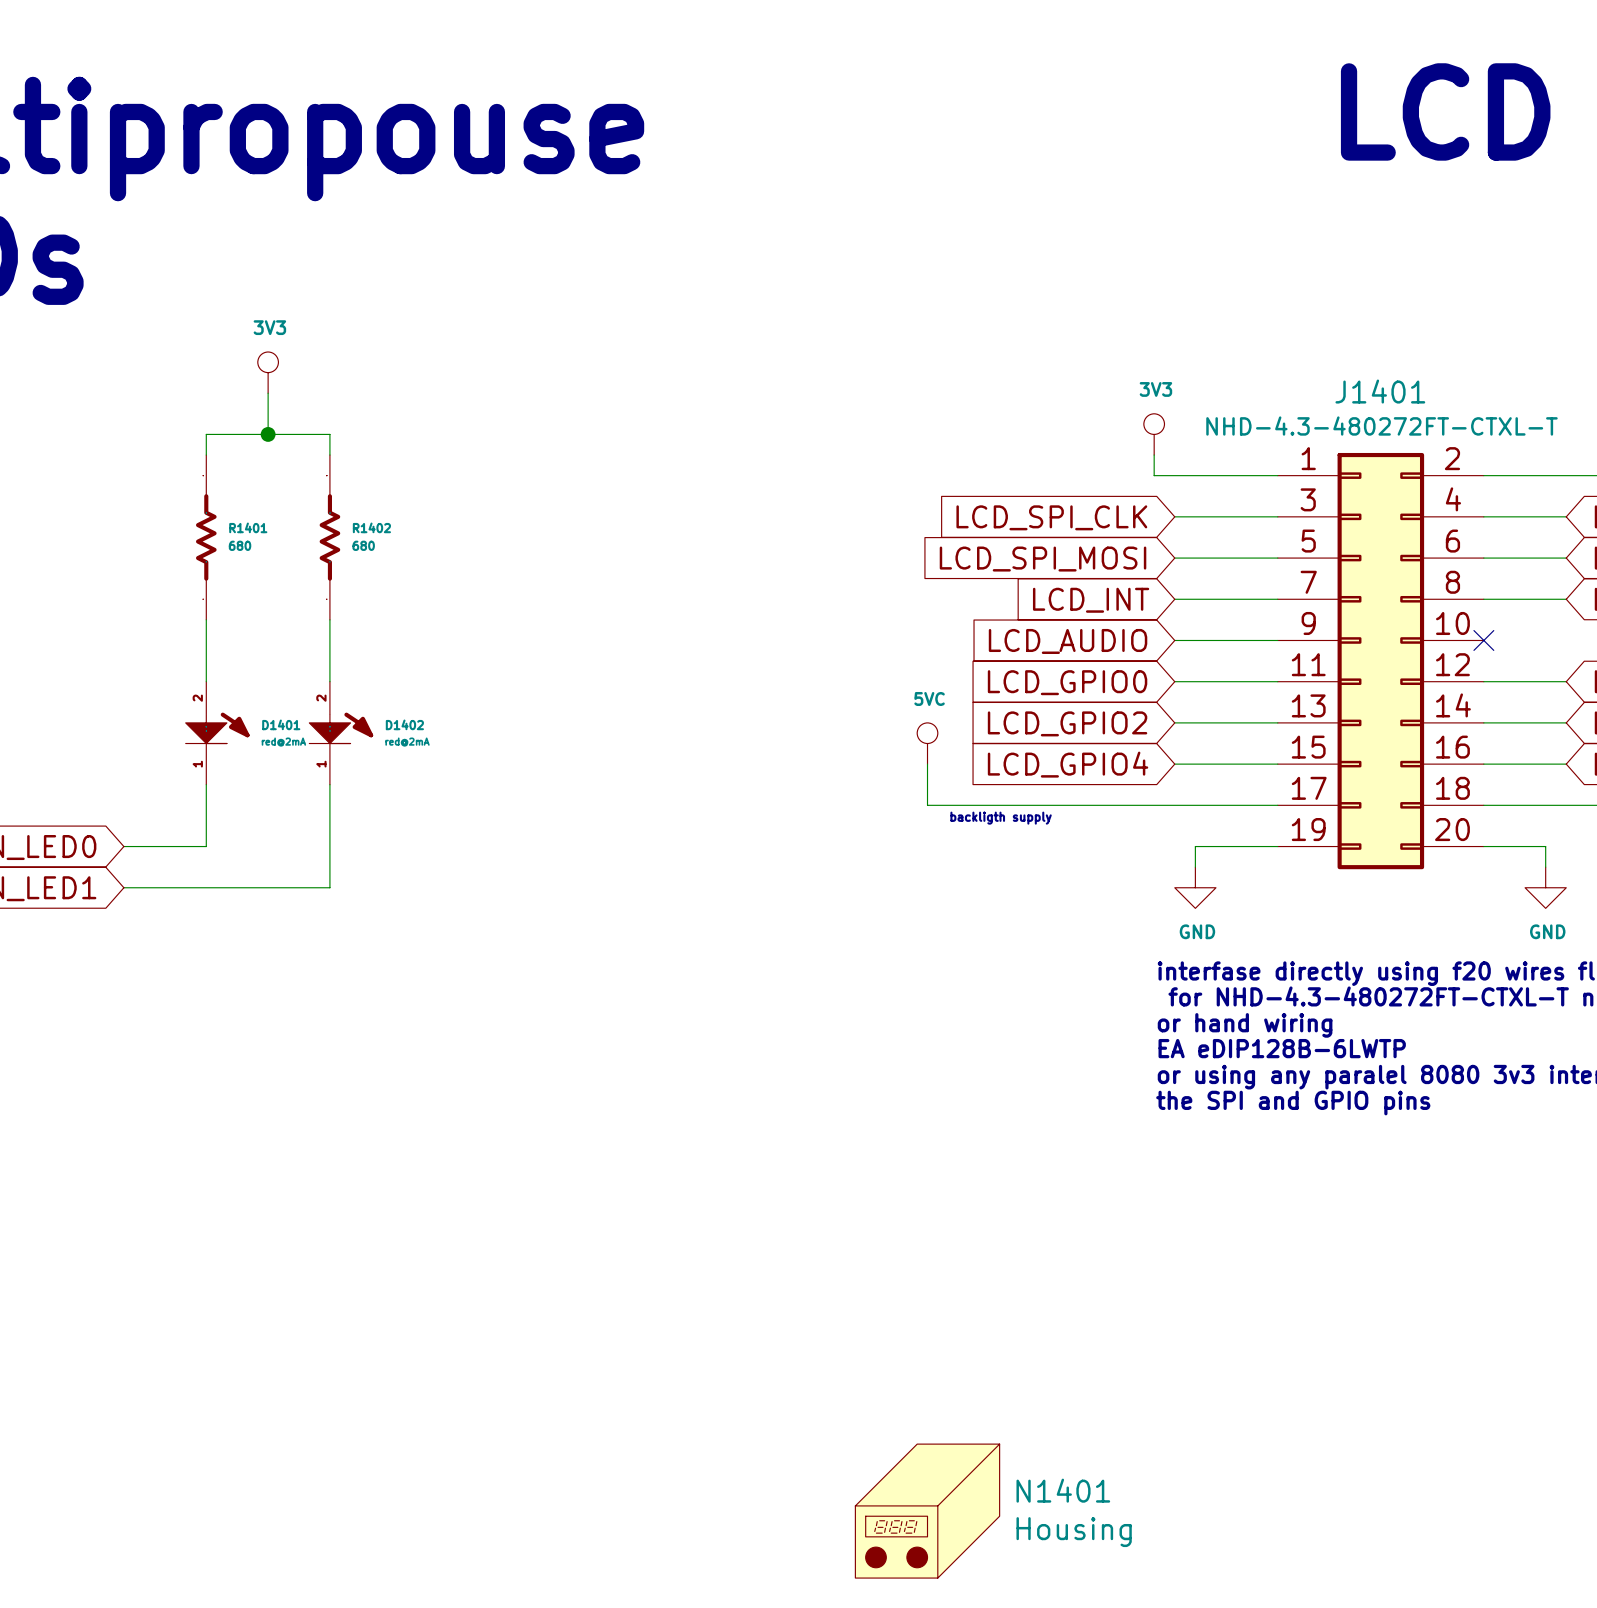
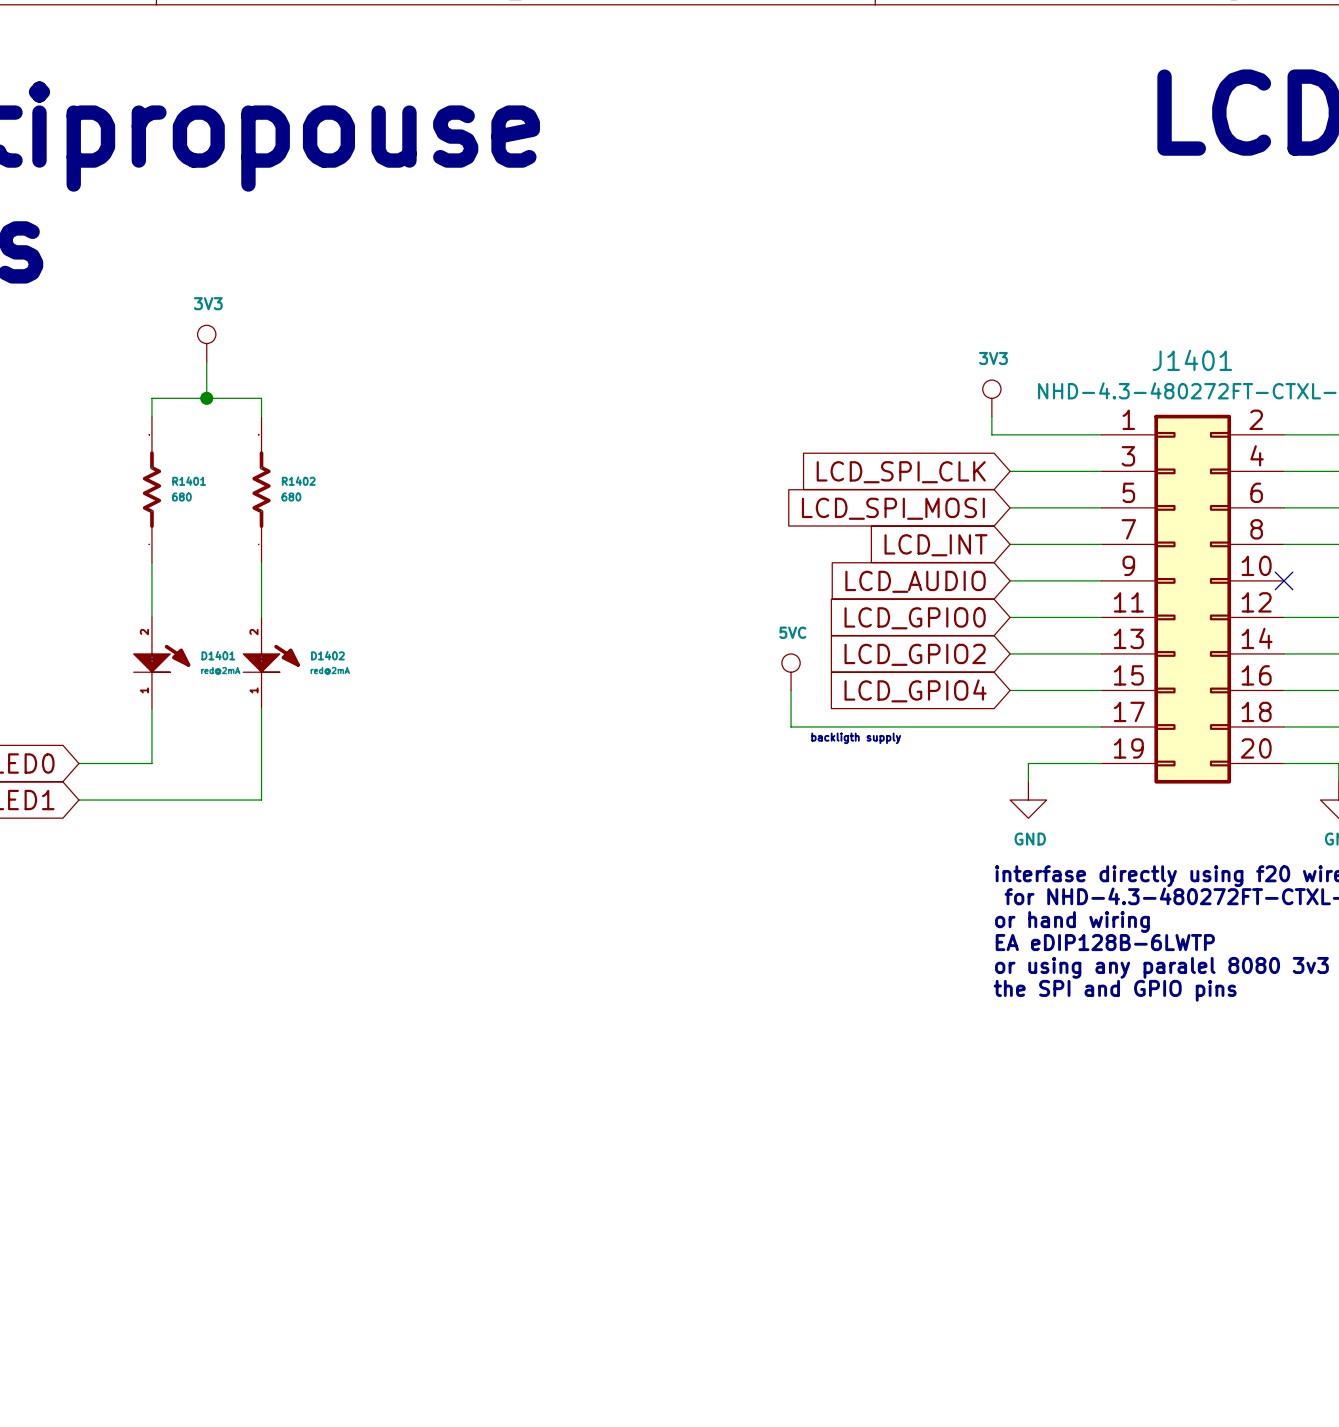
N1401: Housing (927, 1511) -> none

